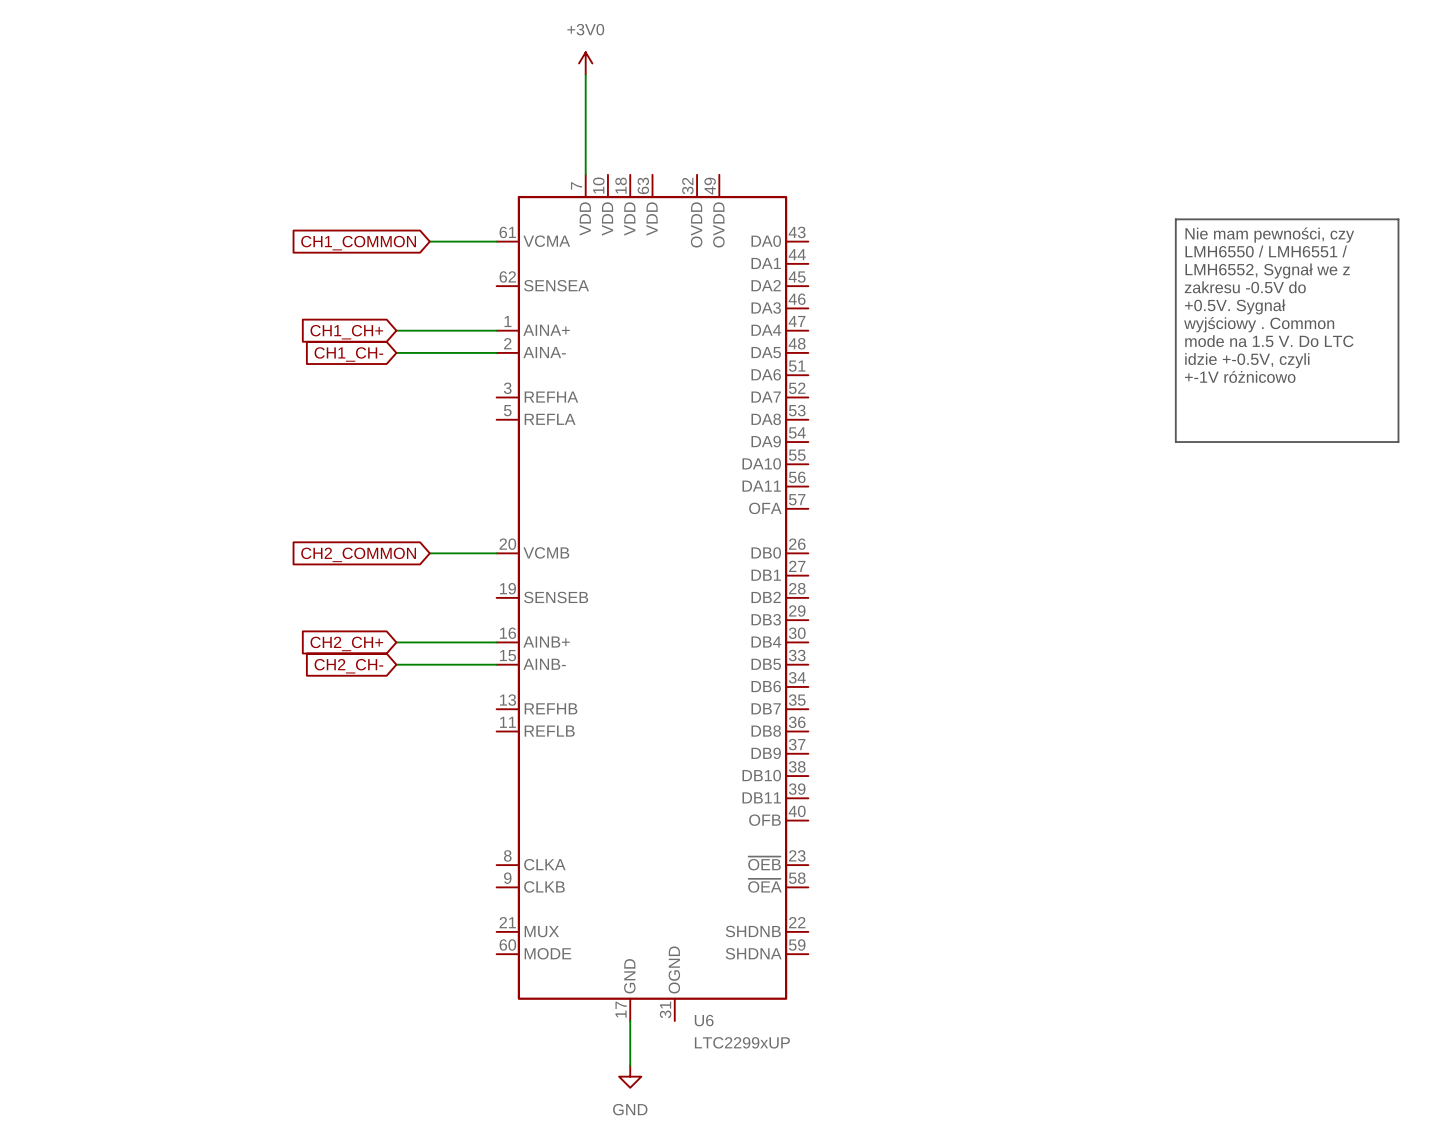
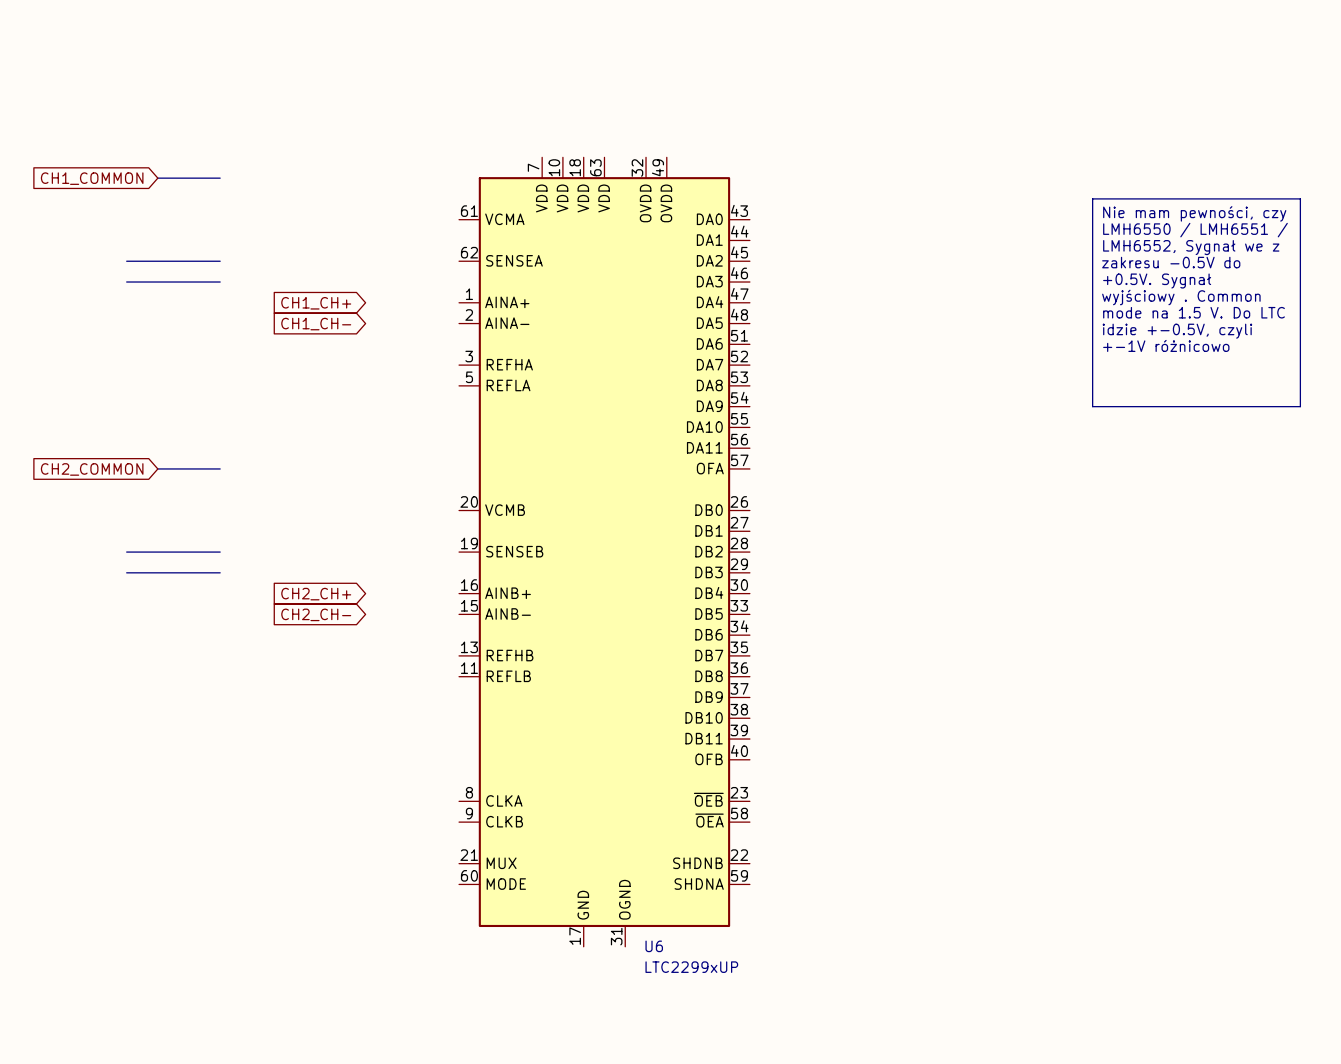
power symbol: +3V0 (585, 63) -> none
wire: (585, 74) (585, 174) -> none
wire: none -> (157, 178) (220, 178)
global label: none -> CH1_COMMON (92, 178)
wire: (429, 241) (496, 241) -> none
global label: CH1_COMMON (358, 243) -> none
wire: none -> (126, 261) (220, 261)
wire: none -> (126, 282) (220, 282)
wire: (396, 330) (496, 330) -> none
wire: (396, 352) (496, 352) -> none
wire: none -> (157, 468) (220, 468)
global label: none -> CH2_COMMON (92, 469)
wire: (429, 553) (496, 553) -> none
global label: CH2_COMMON (358, 554) -> none
wire: none -> (126, 552) (220, 552)
wire: none -> (126, 572) (220, 572)
wire: (396, 642) (496, 642) -> none
wire: (396, 664) (496, 664) -> none
wire: (630, 1020) (630, 1065) -> none
power symbol: GND (630, 1076) -> none

